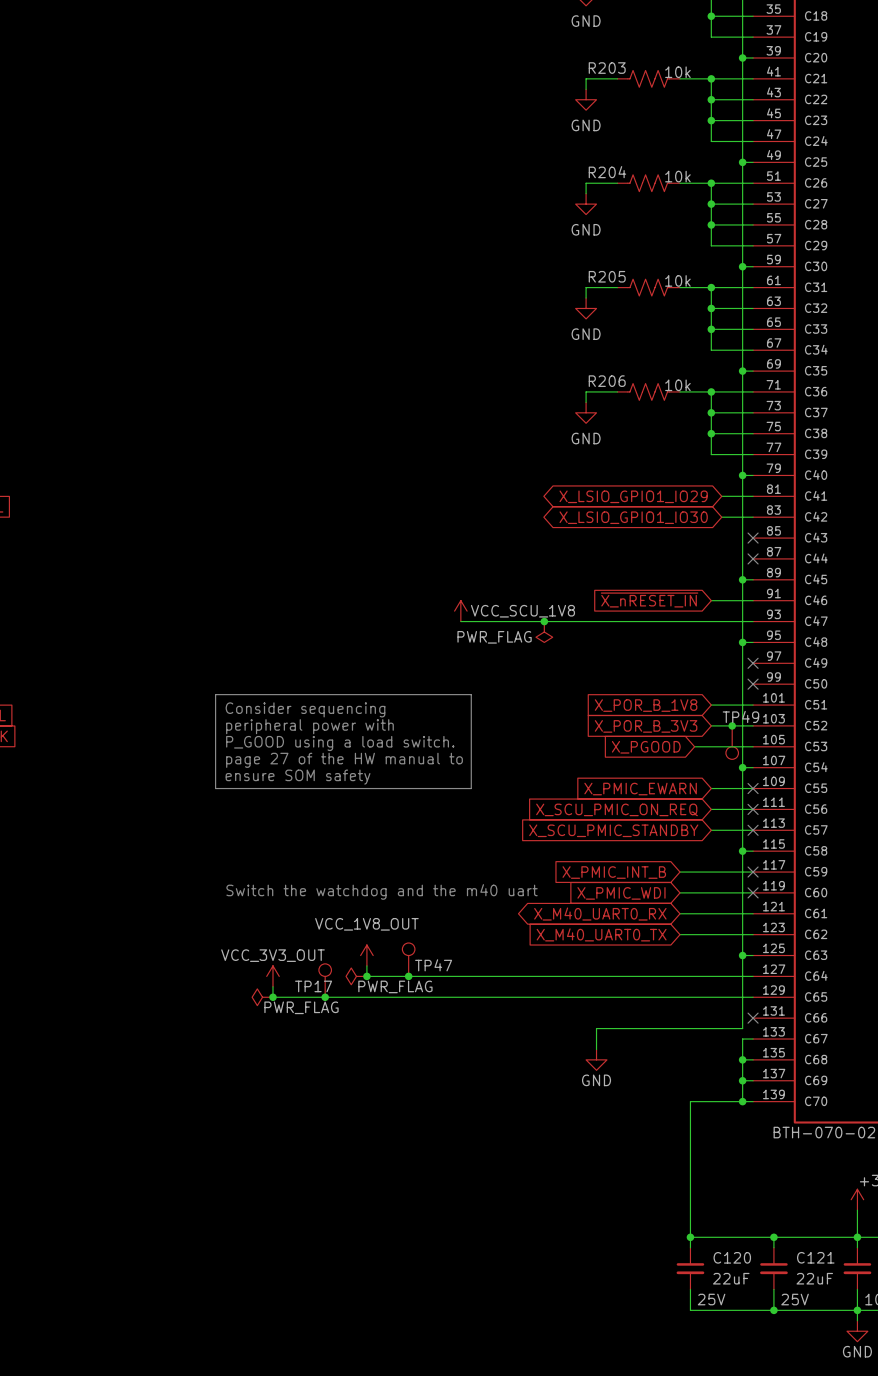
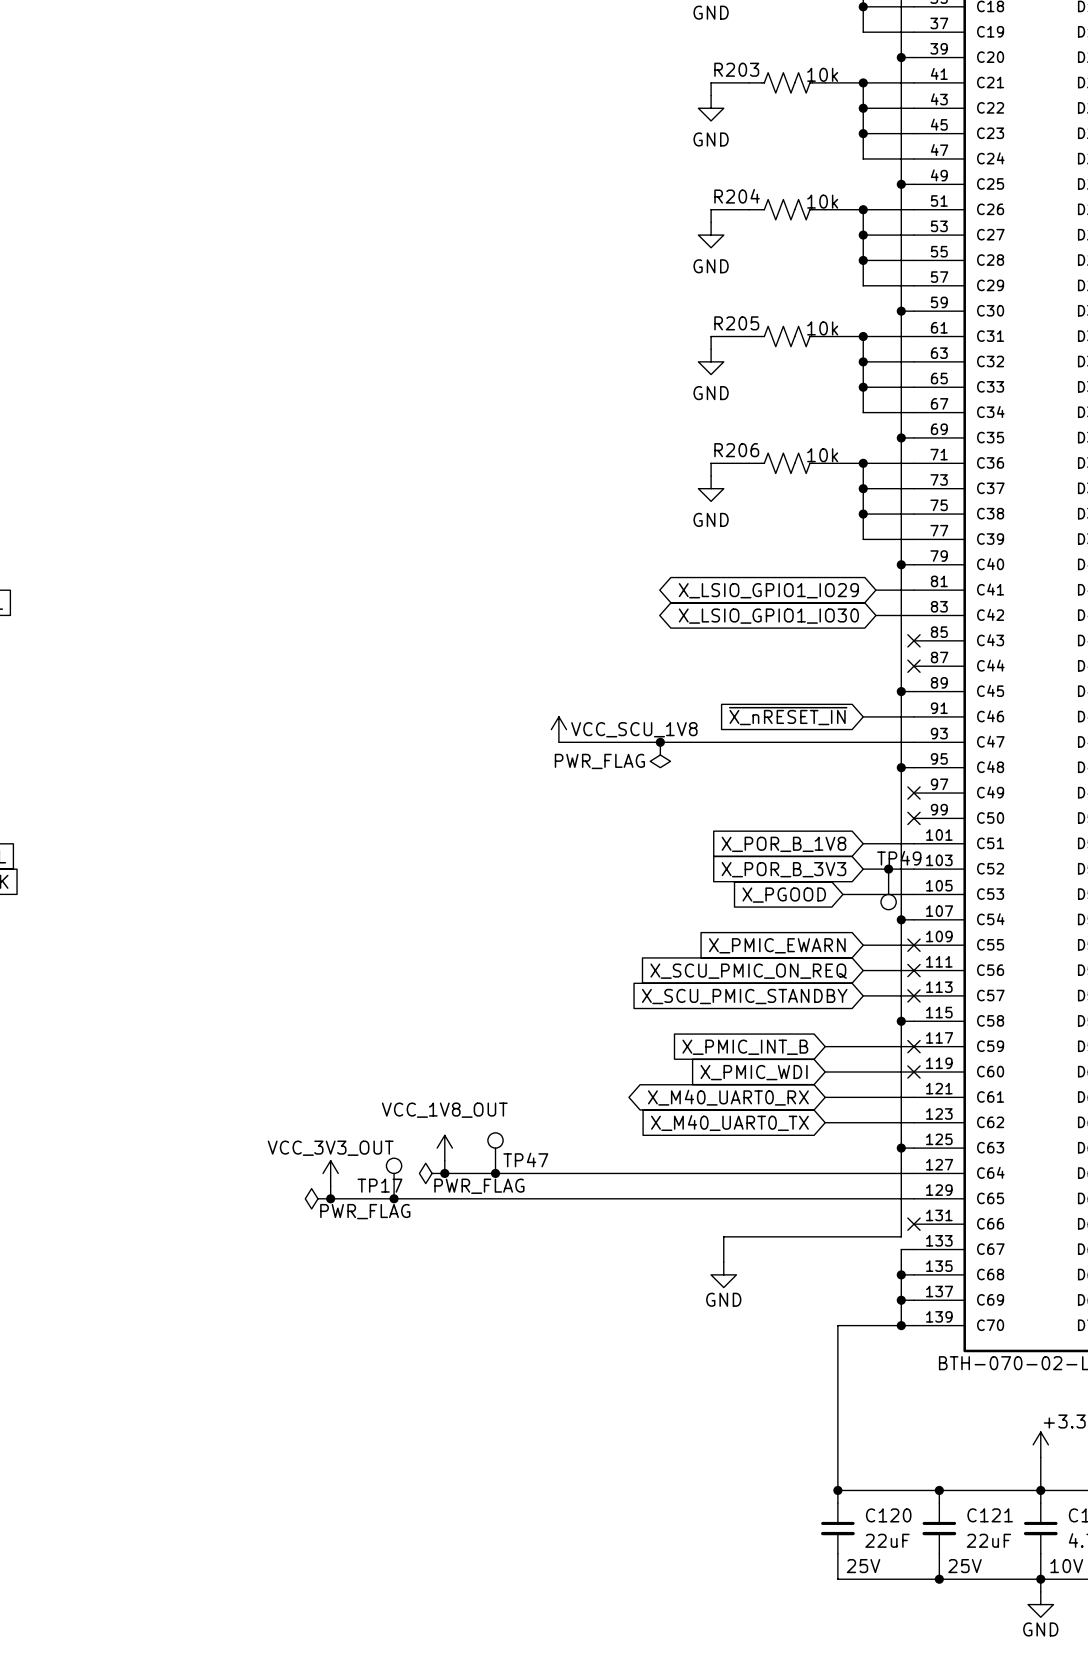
line: (215, 694) (471, 694) (471, 788) (215, 788) (215, 694) -> none
text: Consider sequencing (305, 709) -> none
text: peripheral power with (309, 726) -> none
text: P_GOOD using a load switch. (340, 743) -> none
text: page 27 of the HW manual to (344, 760) -> none
text: ensure SOM safety (298, 777) -> none
text: Switch the watchdog and the m40 uart (382, 891) -> none

